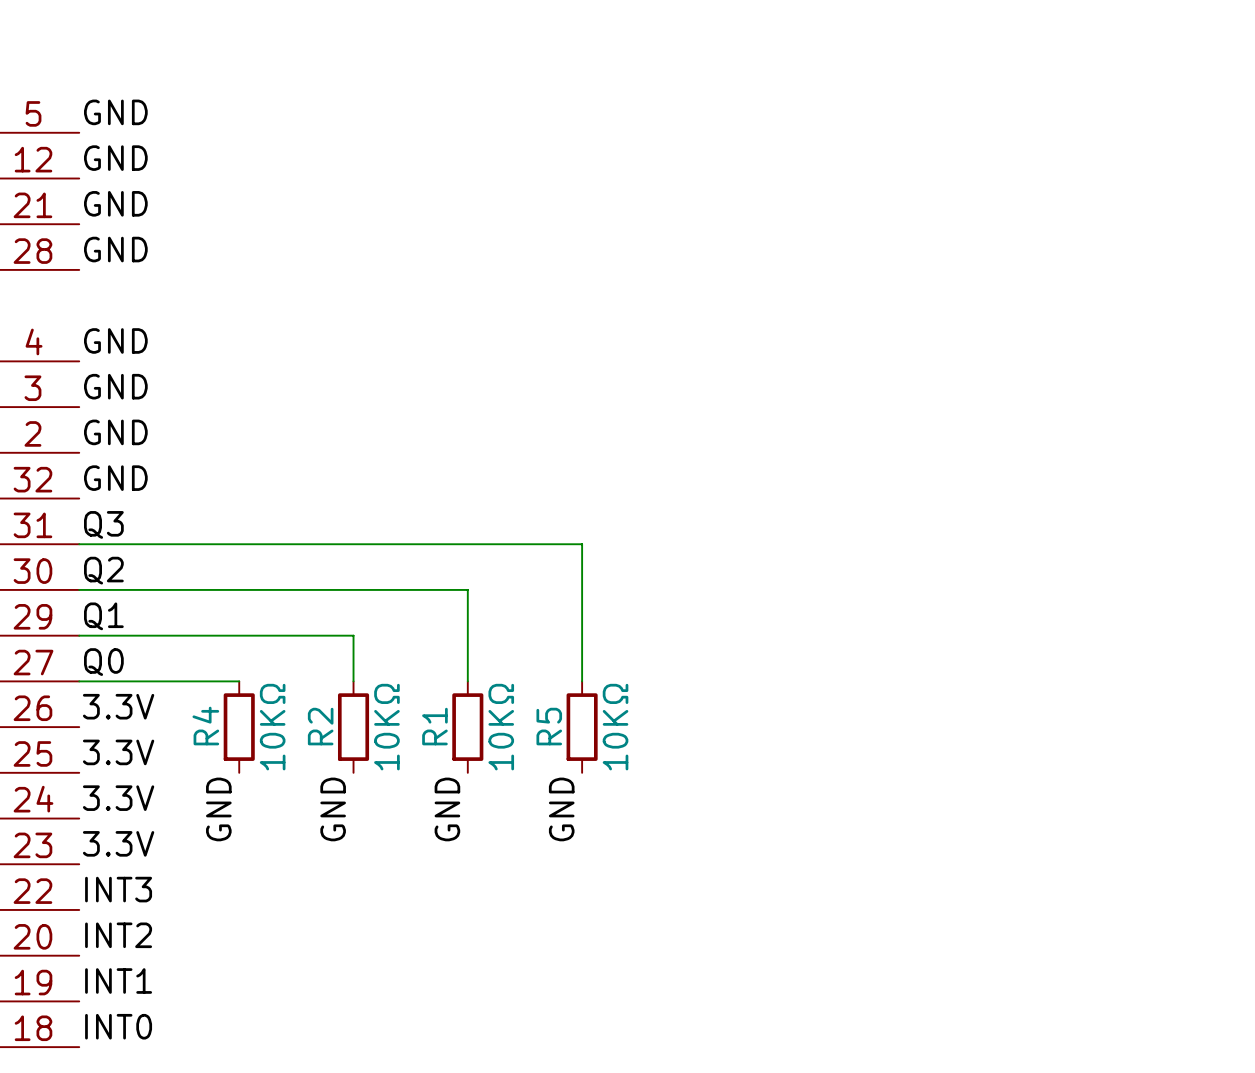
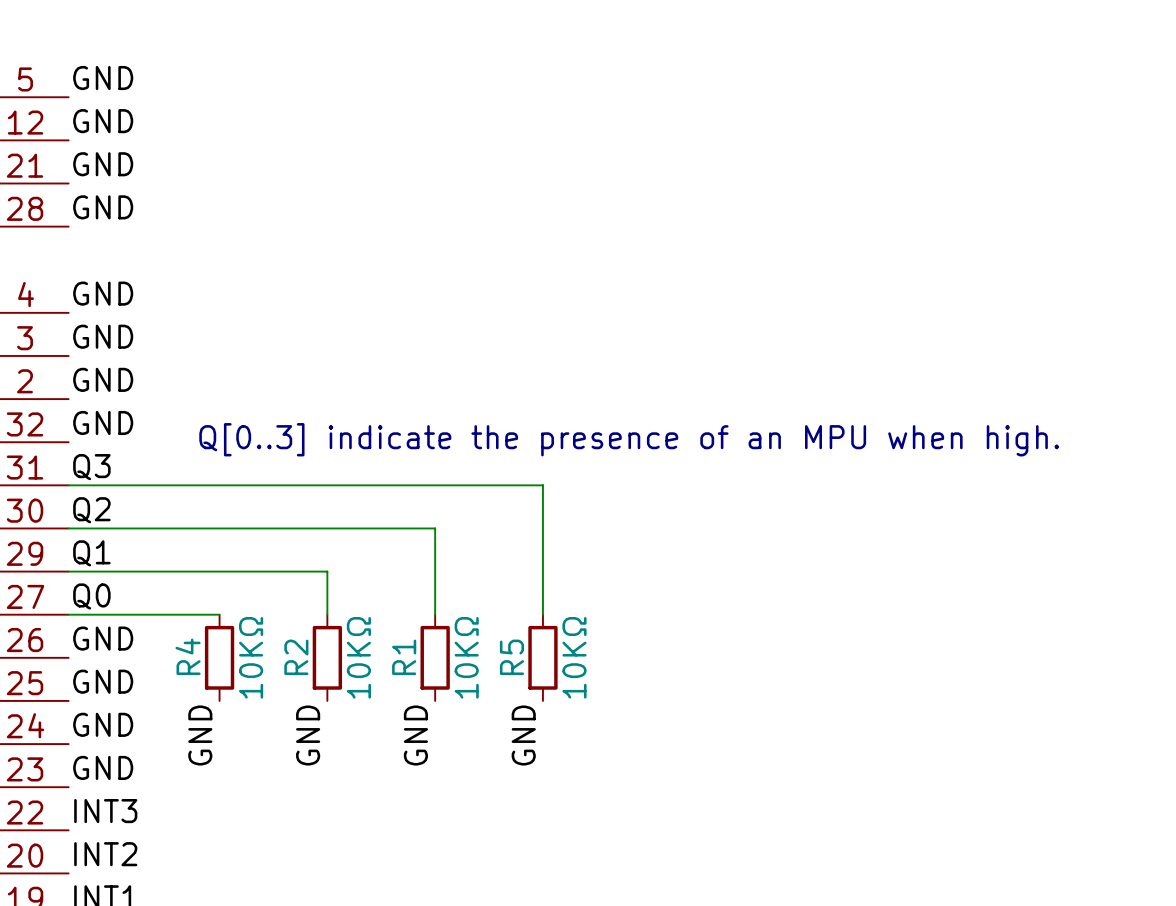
text: none -> Q[0..3] indicate the presence of an MPU when high. (629, 439)
label: 3.3V (118, 706) -> GND (103, 638)
label: 3.3V (118, 752) -> GND (103, 681)
label: 3.3V (118, 798) -> GND (103, 724)
label: 3.3V (118, 843) -> GND (103, 767)

